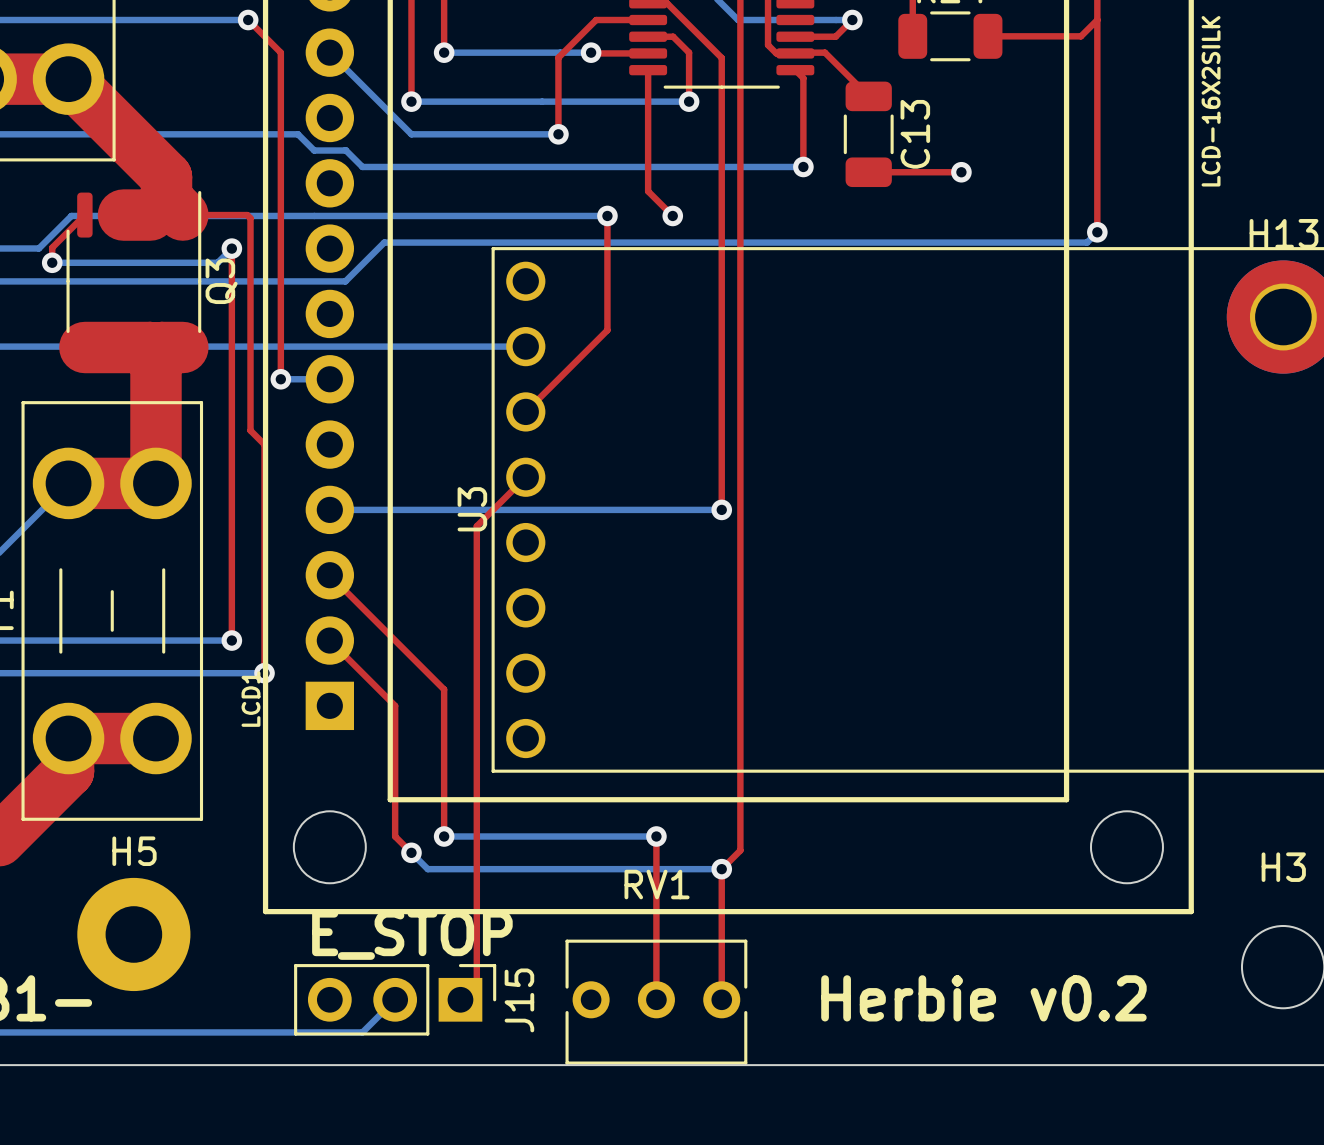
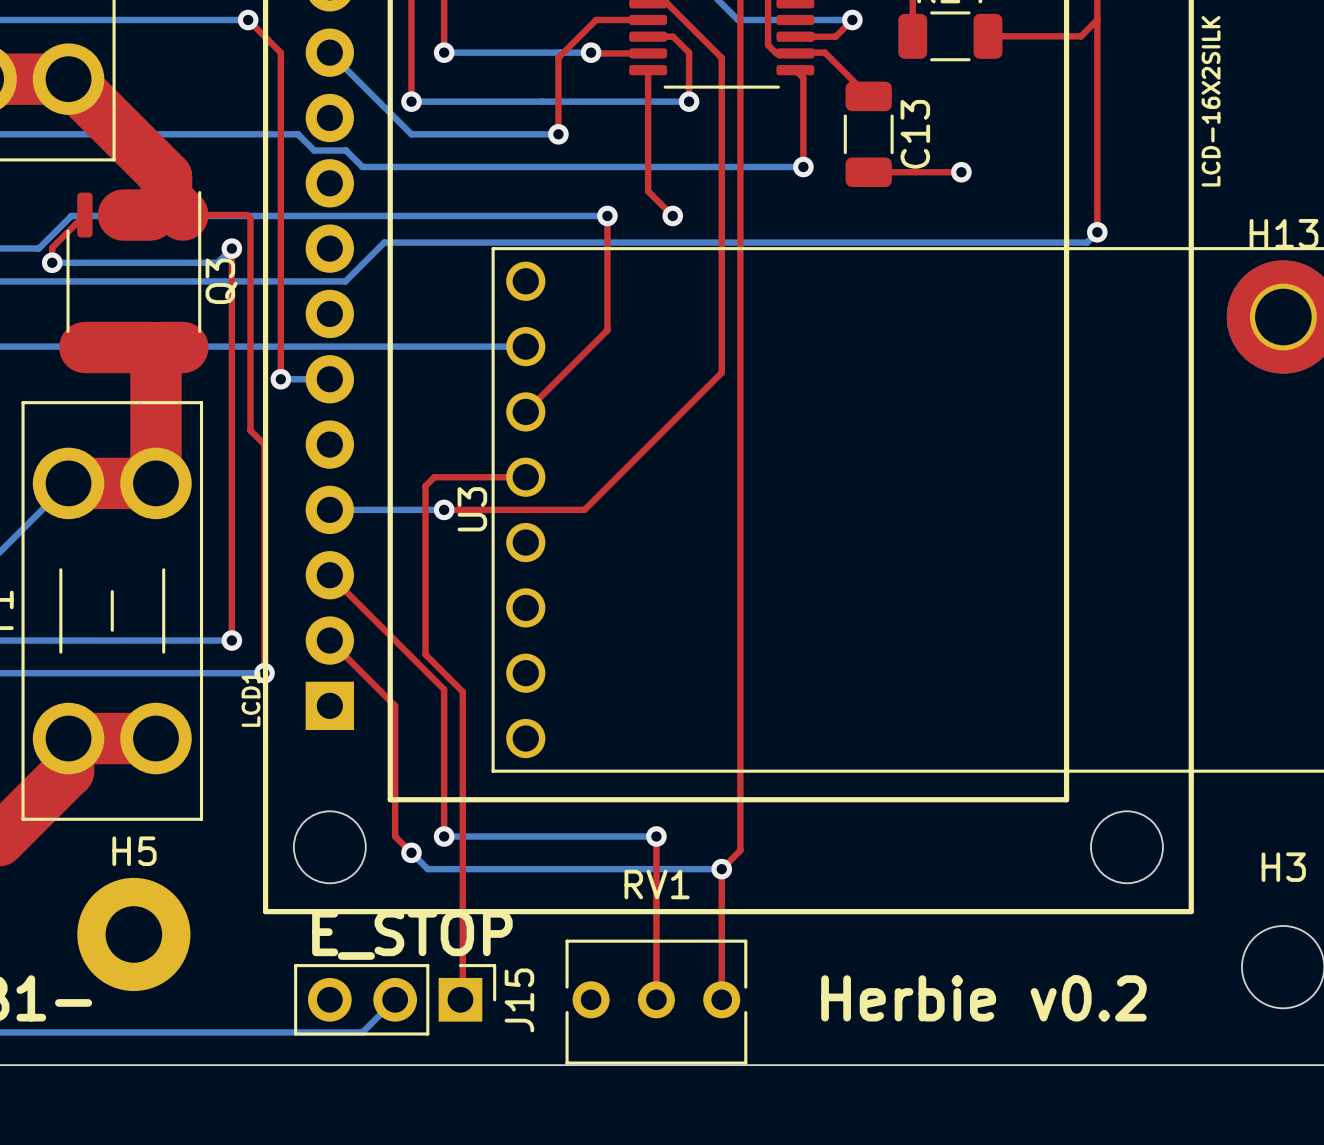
top track: (721, 372) (721, 509) -> (721, 372) (584, 509) (444, 509)
top track: (525, 477) (476, 526) (476, 983) -> (525, 477) (434, 477) (425, 486) (425, 654) (462, 691) (462, 997)
bottom track: (444, 509) (721, 509) -> none
via: none -> (444, 509)
via: (721, 509) -> none

